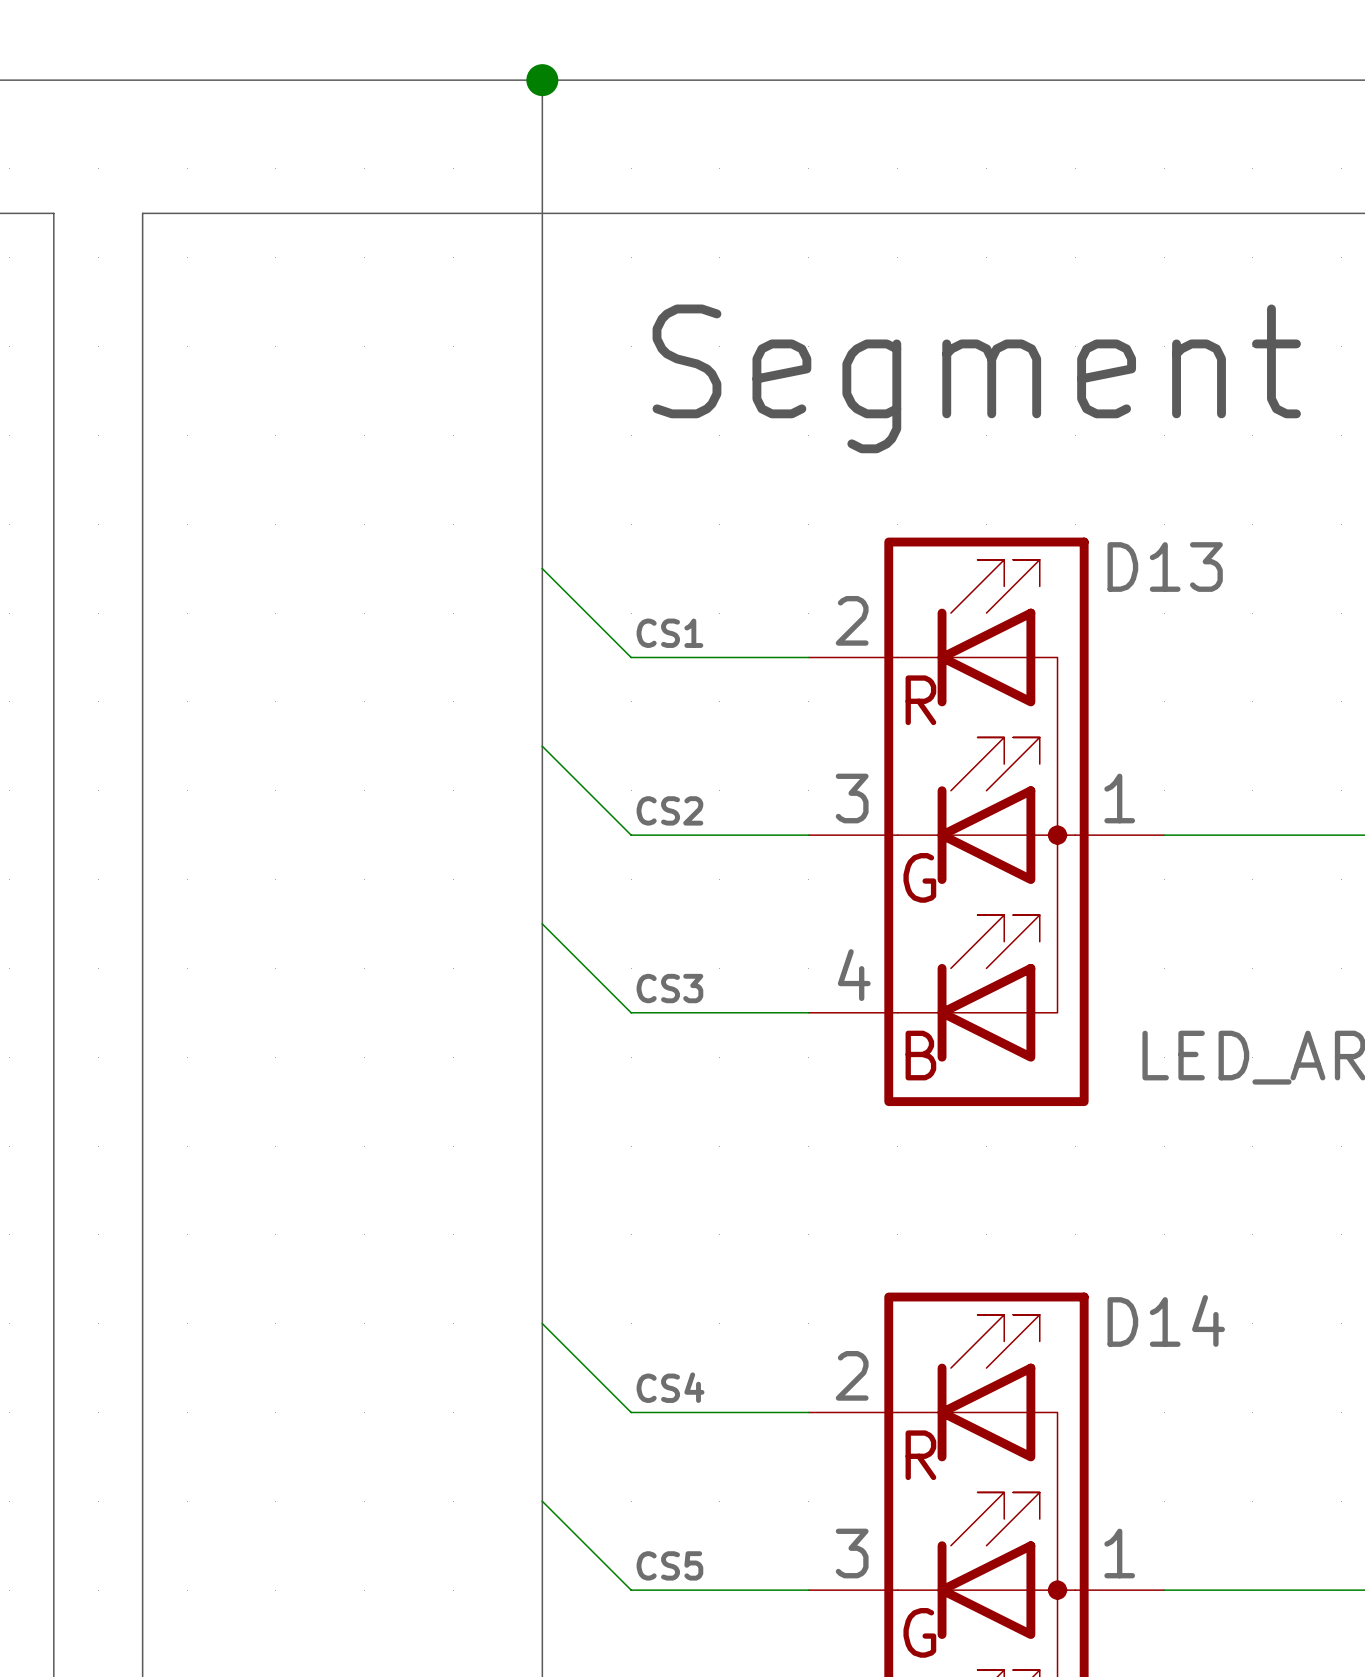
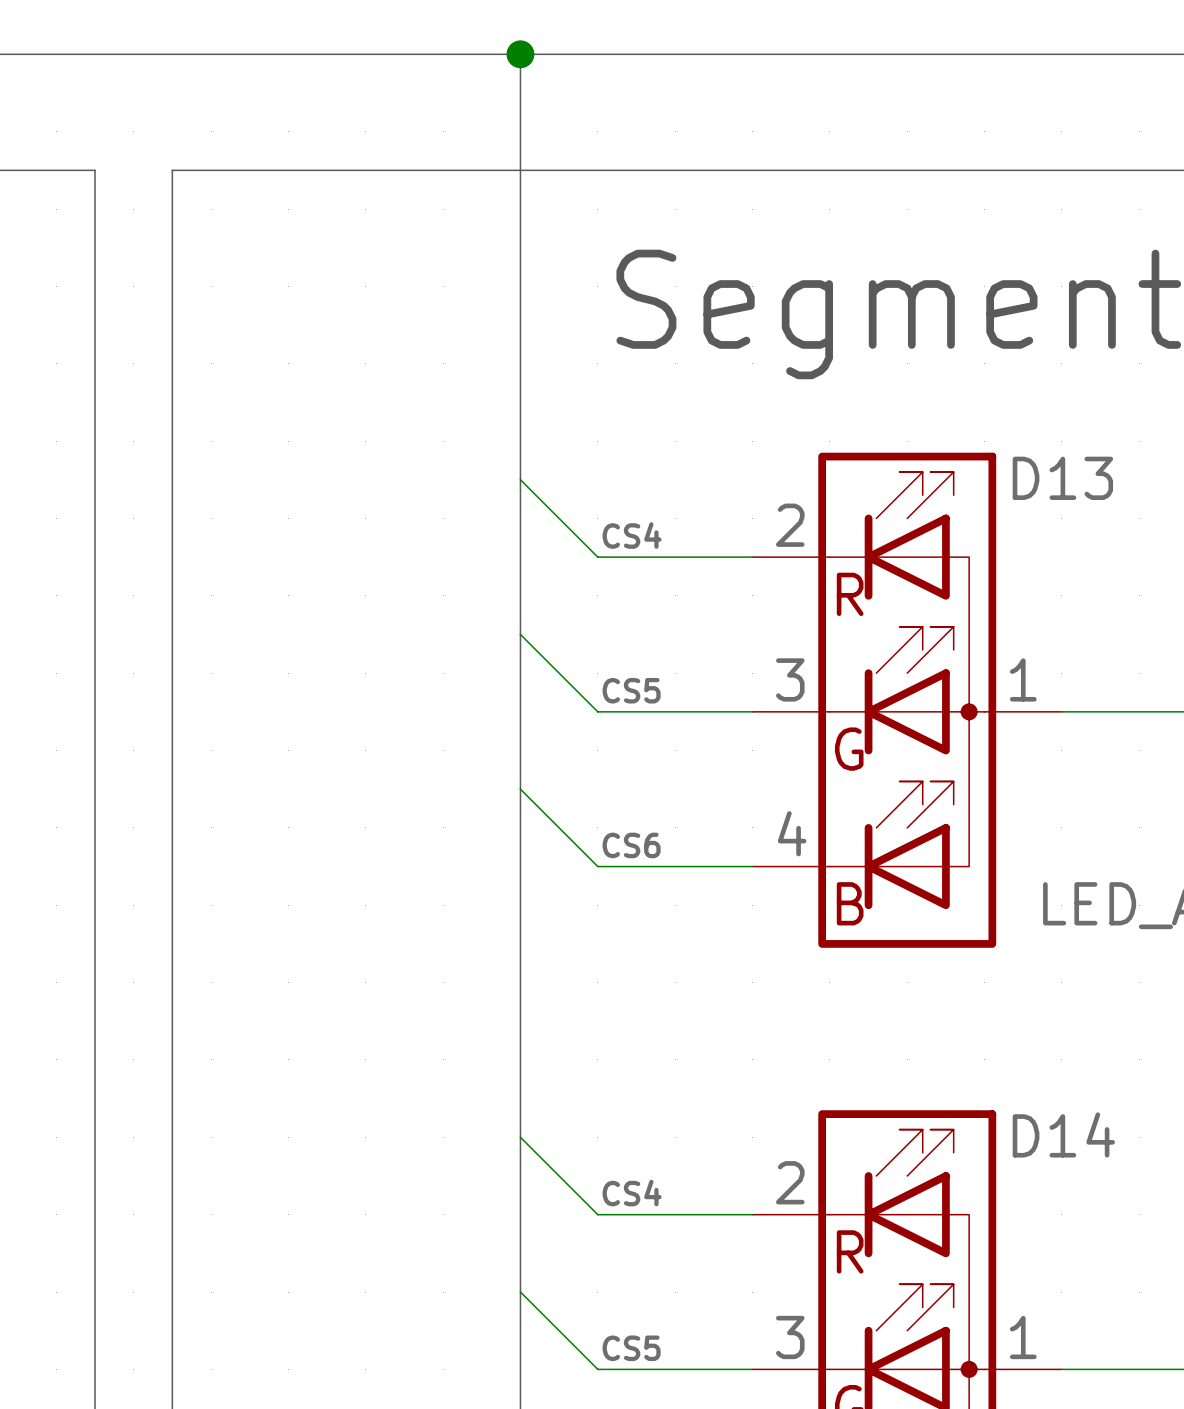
label: CS1 (669, 633) -> CS4 (632, 535)
label: CS2 (669, 810) -> CS5 (631, 690)
label: CS3 (669, 988) -> CS6 (631, 845)

